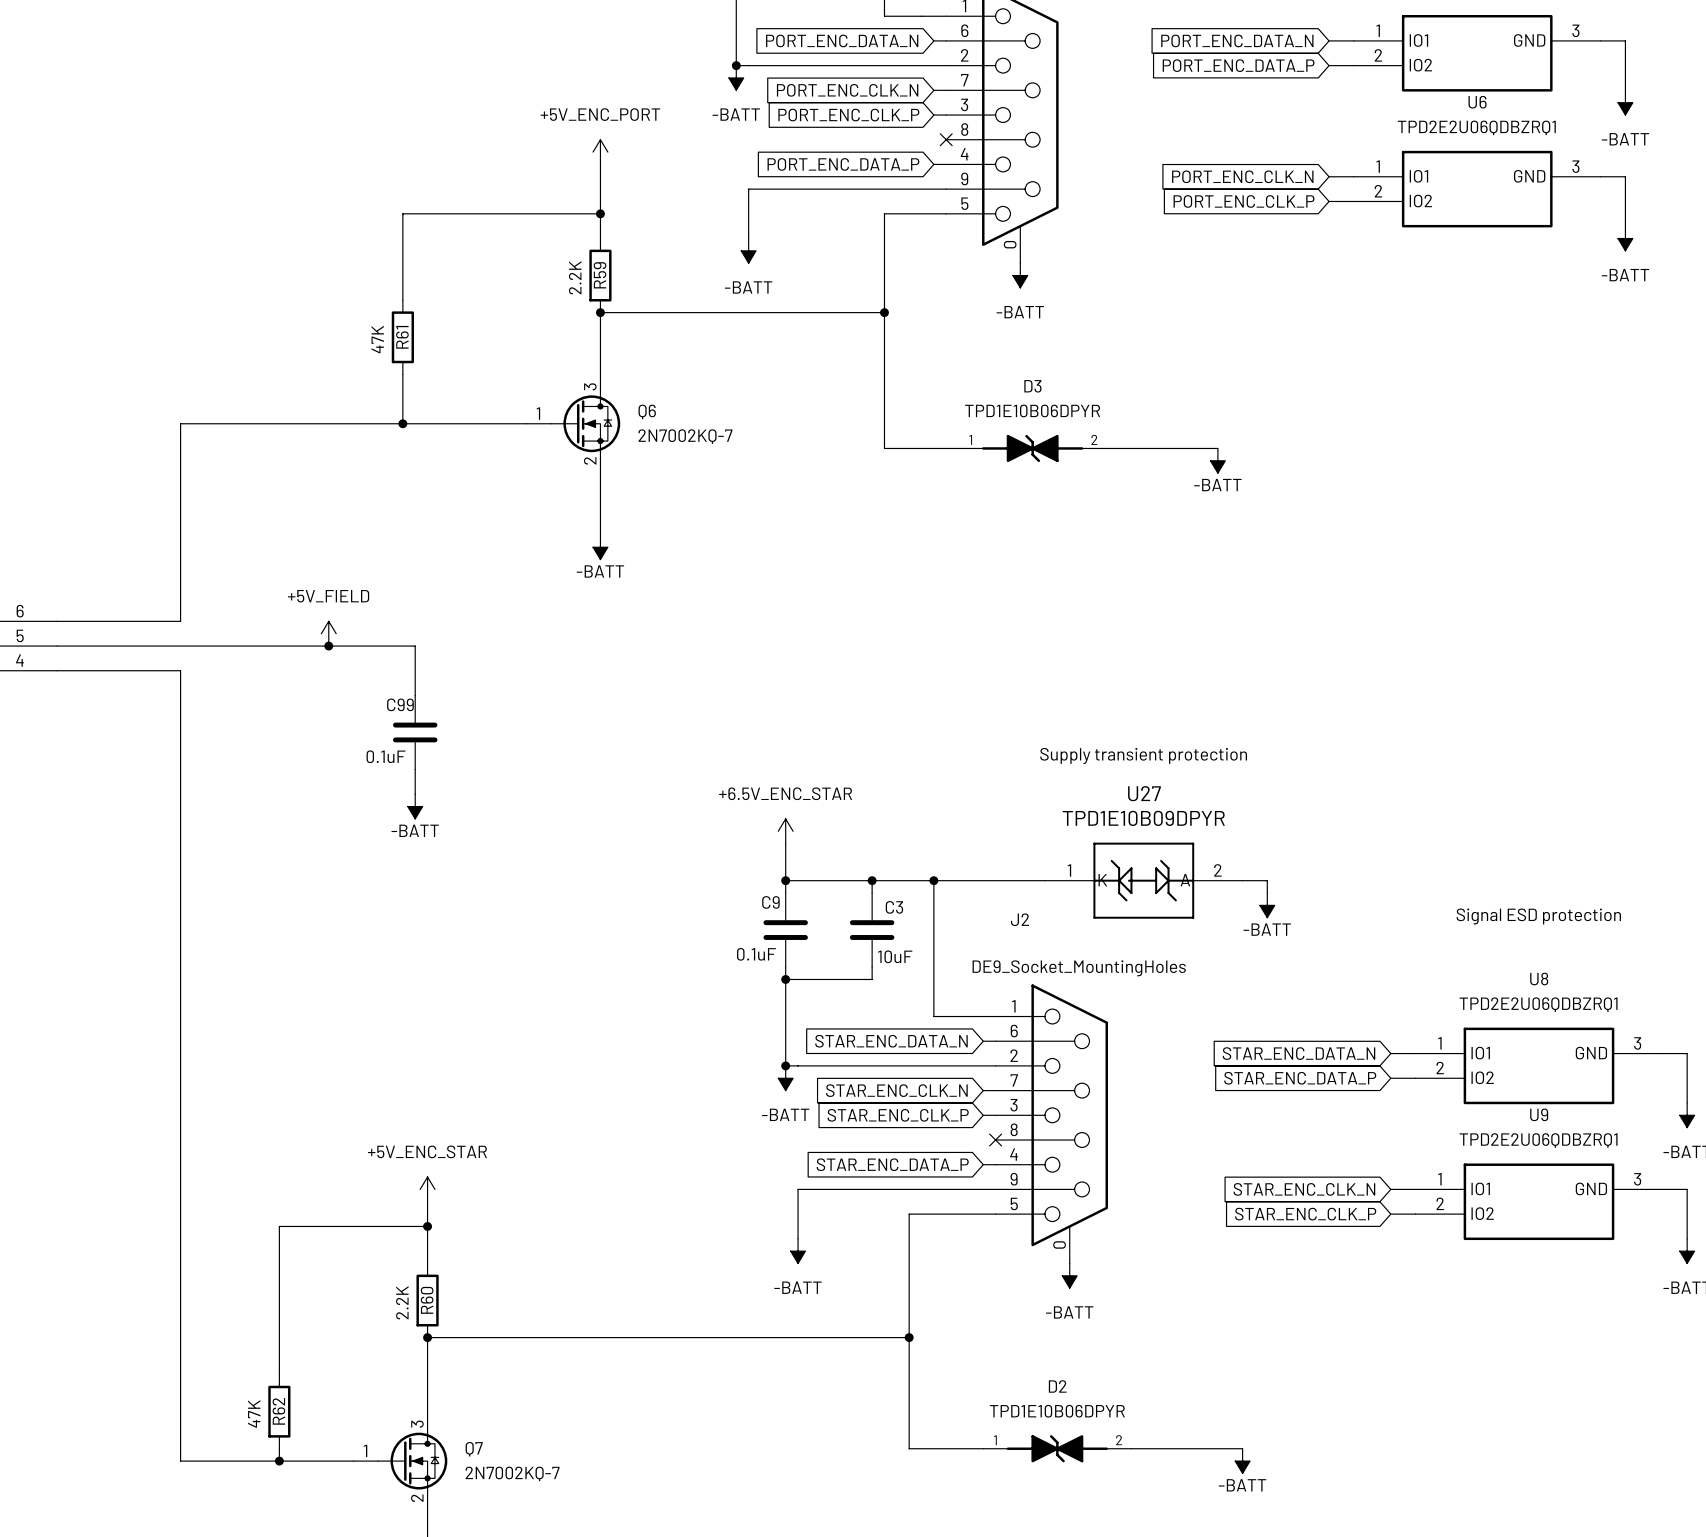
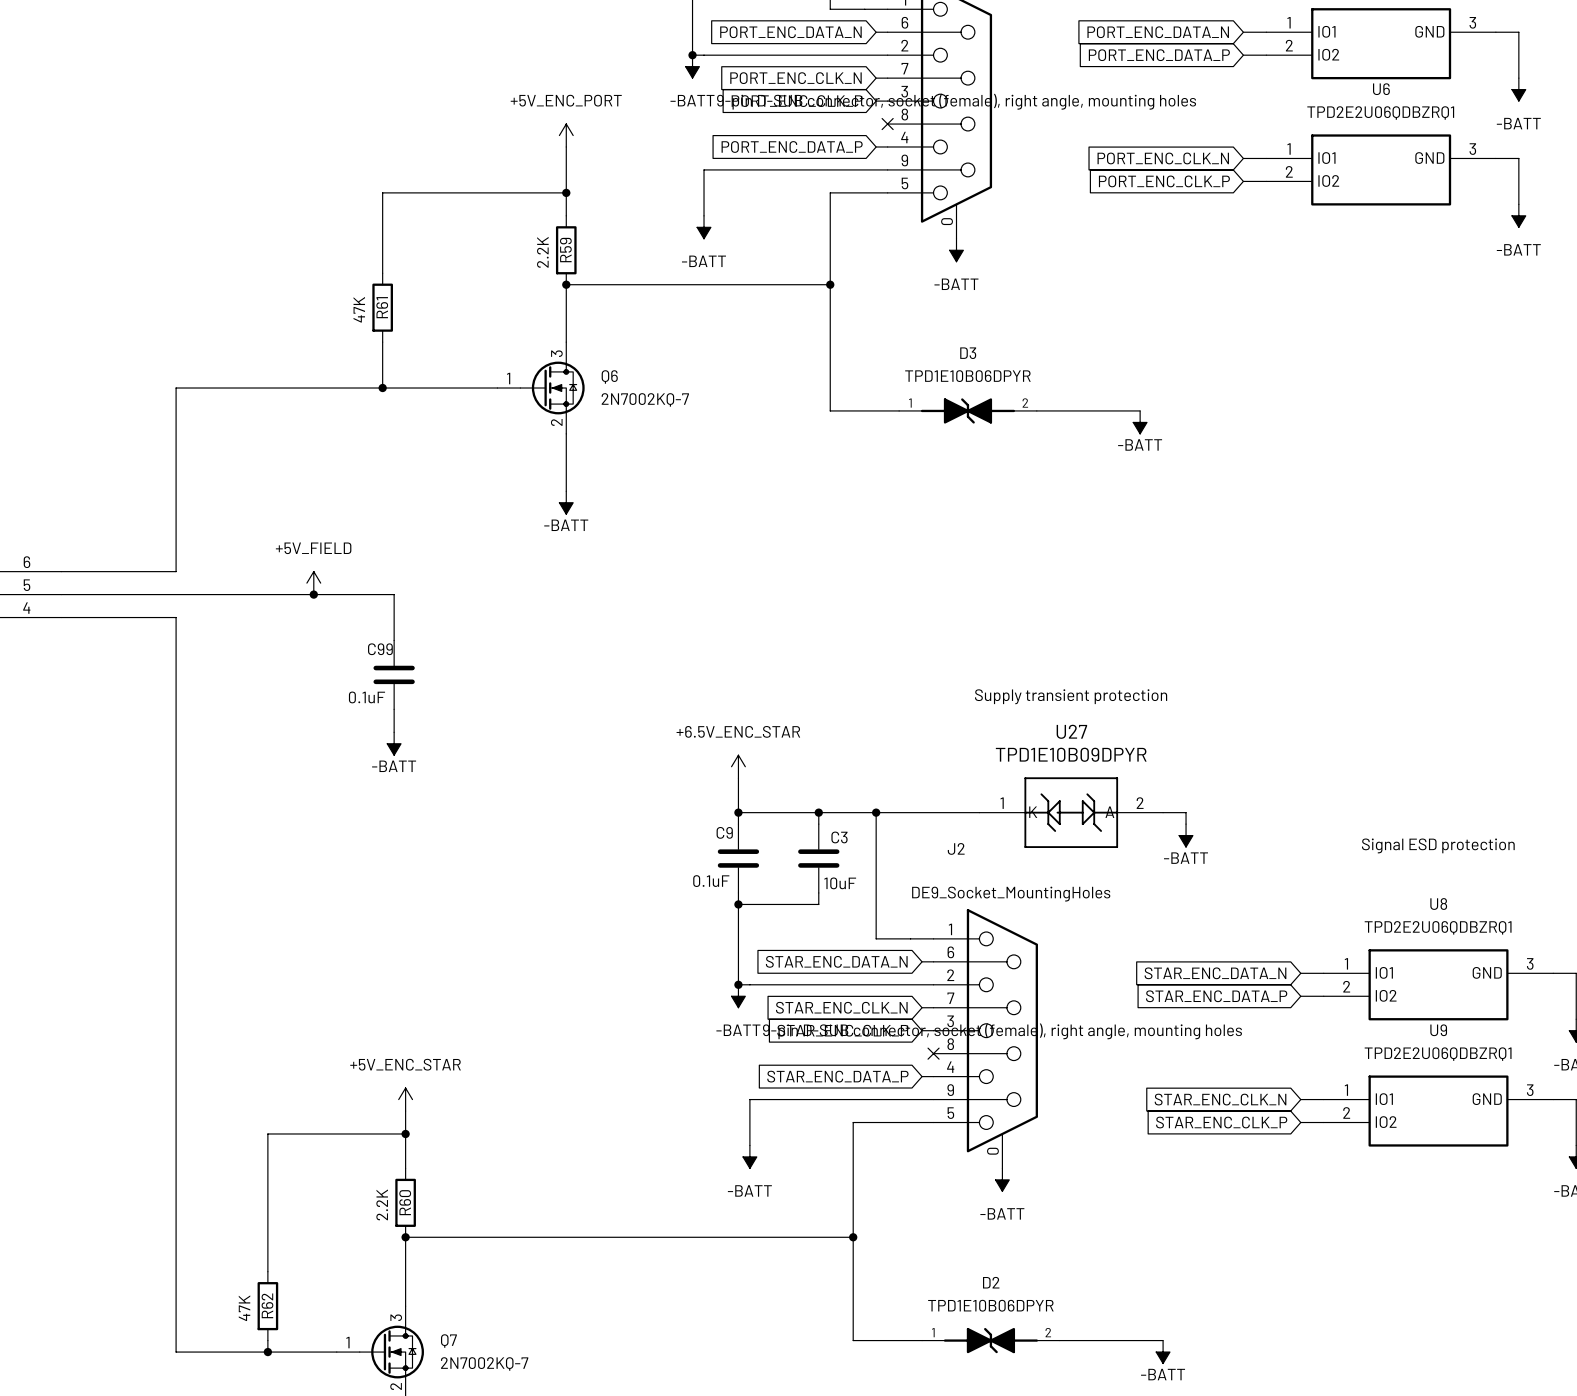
part text: none -> 9-pin D-SUB connector, socket (female), right angle, mounting holes (956, 101)
J2 text: none -> 9-pin D-SUB connector, socket (female), right angle, mounting holes (1002, 1031)

